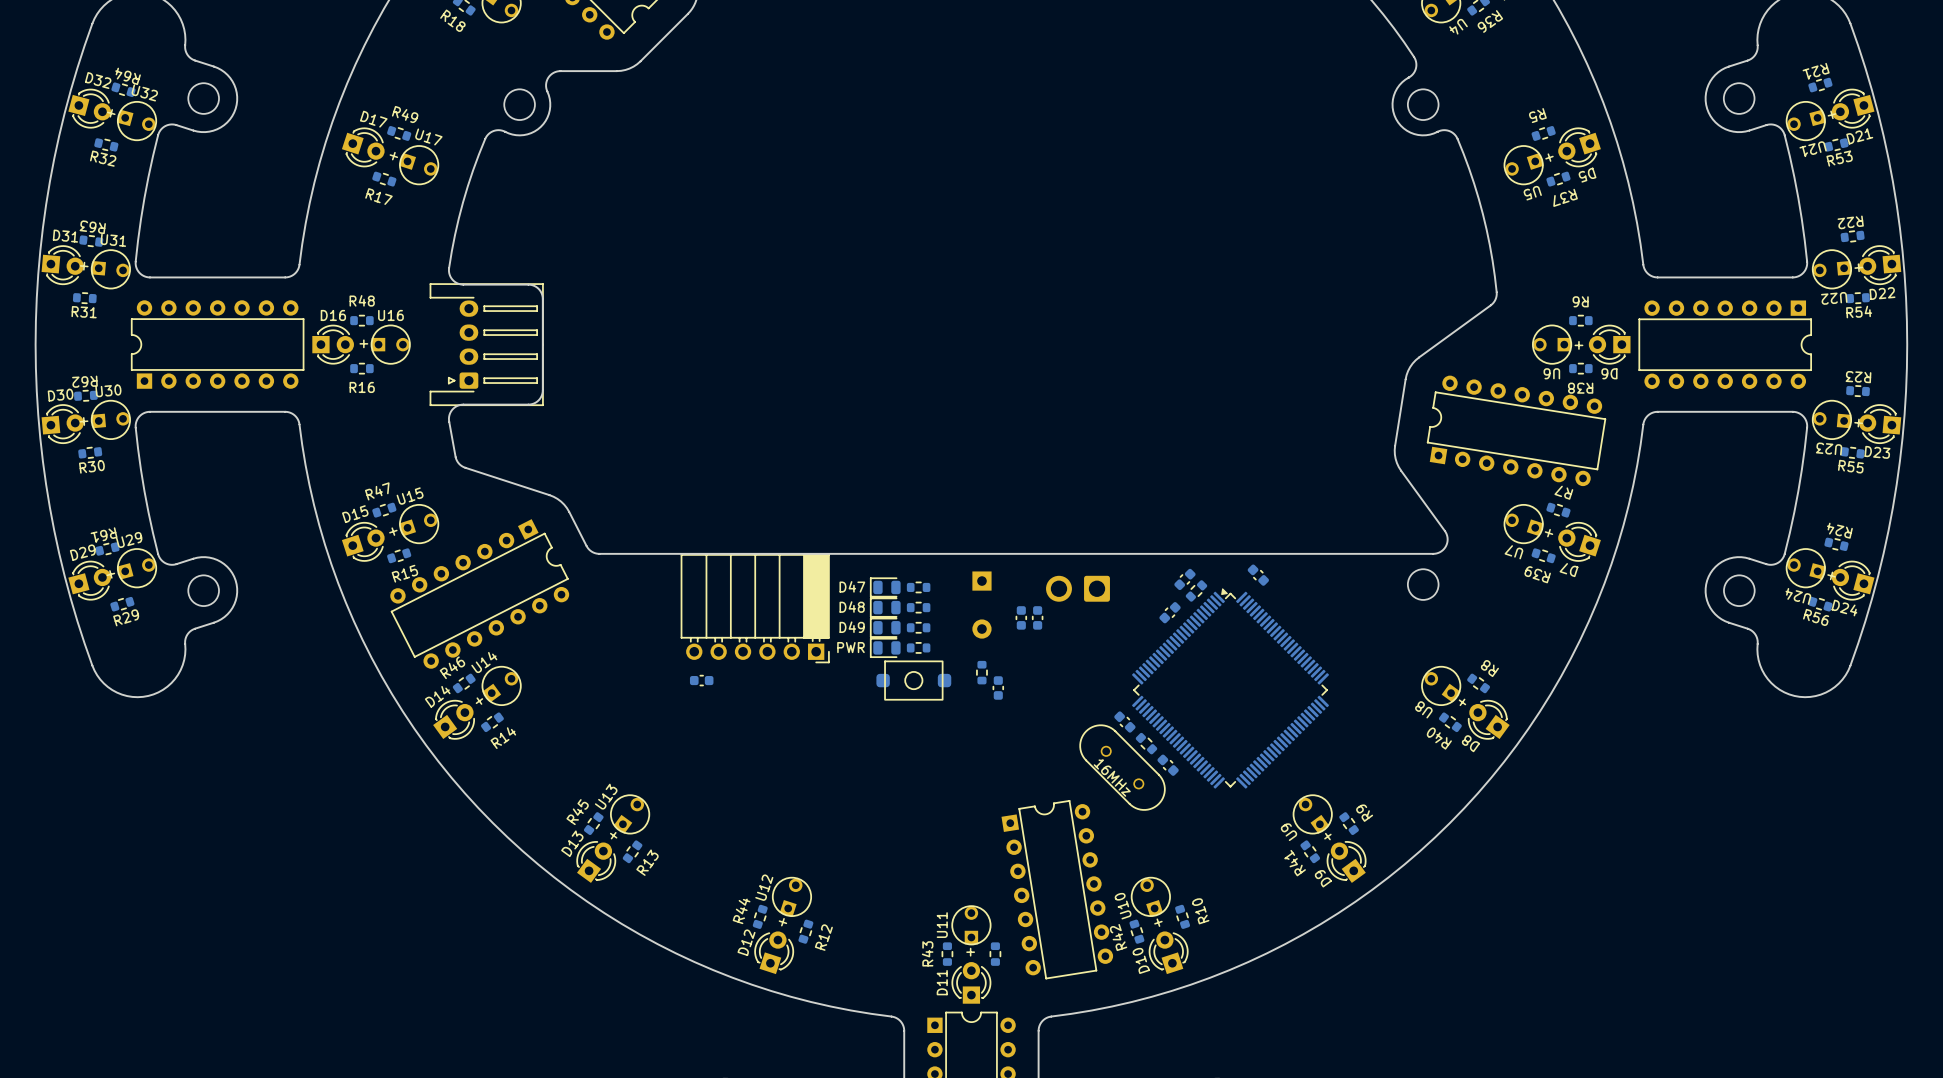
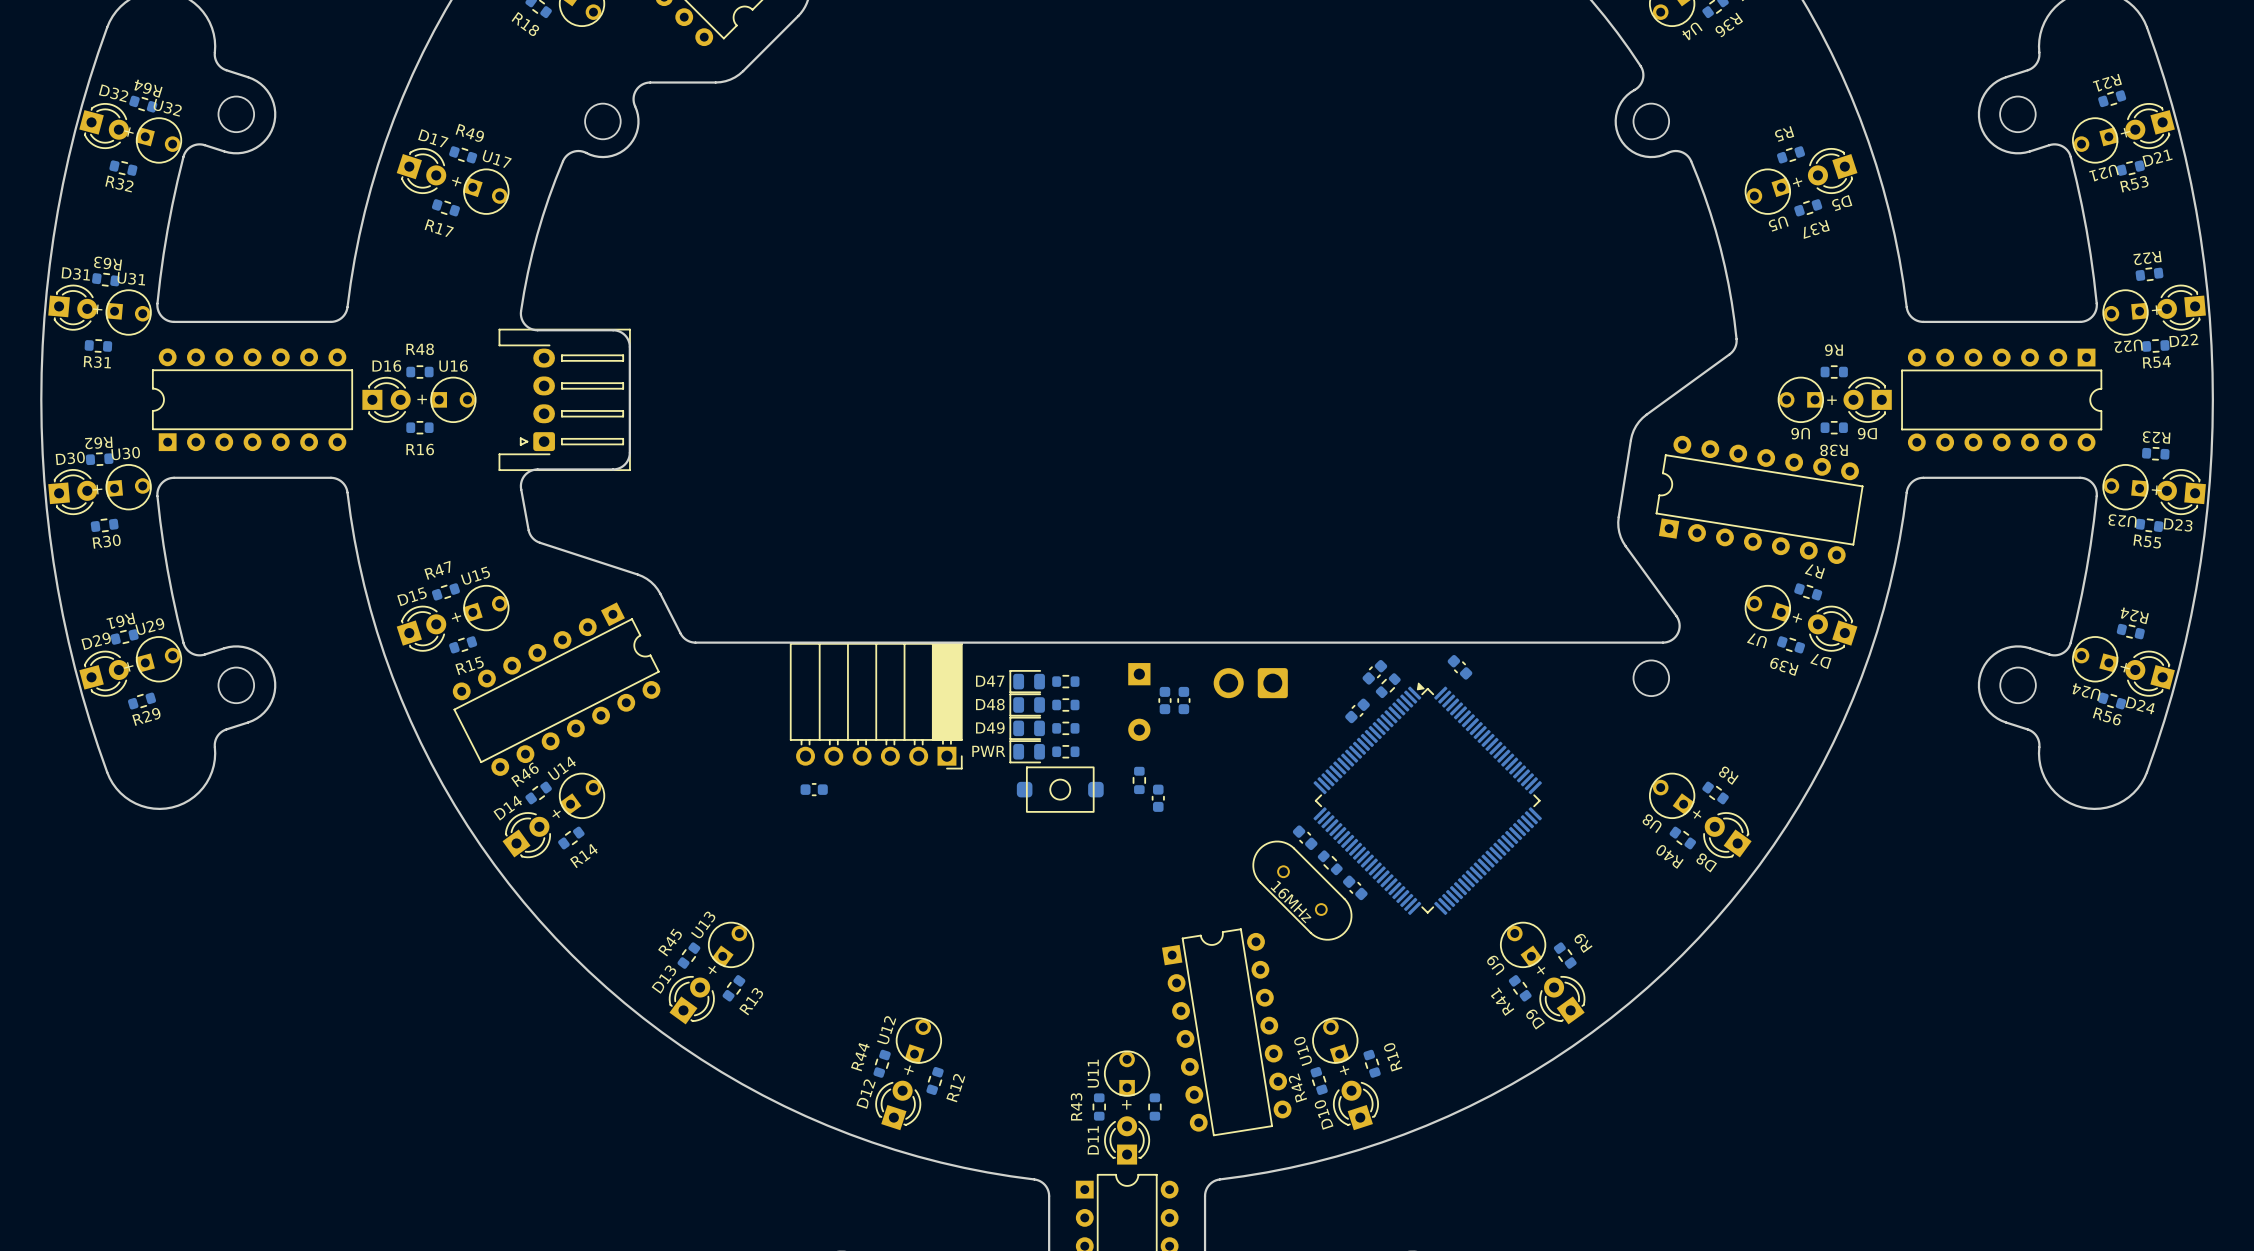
part: none -> (1164, 700)
part: none -> (1183, 700)
part: (1021, 617) -> none
part: (1037, 617) -> none

